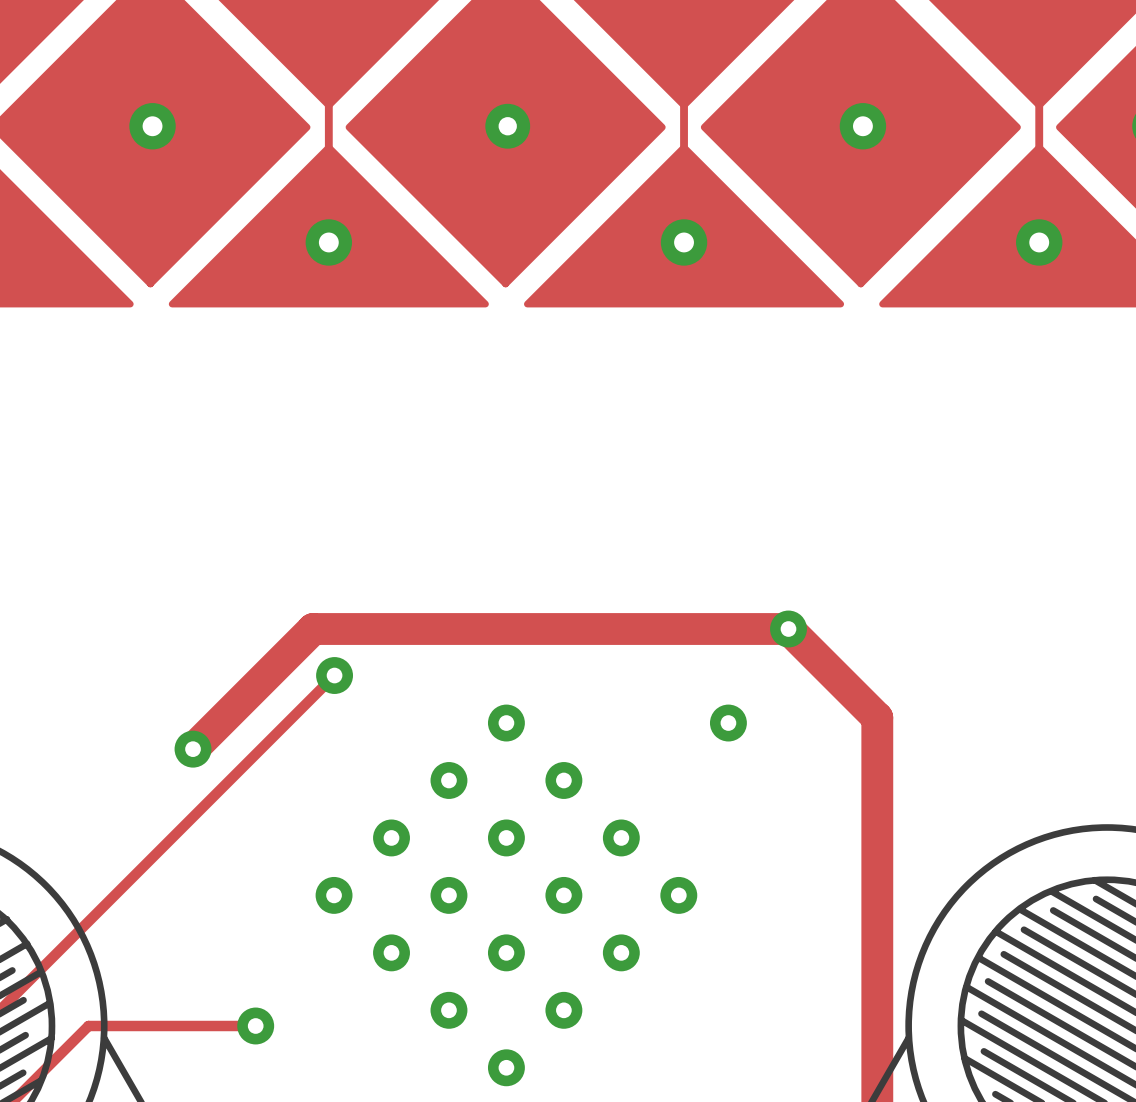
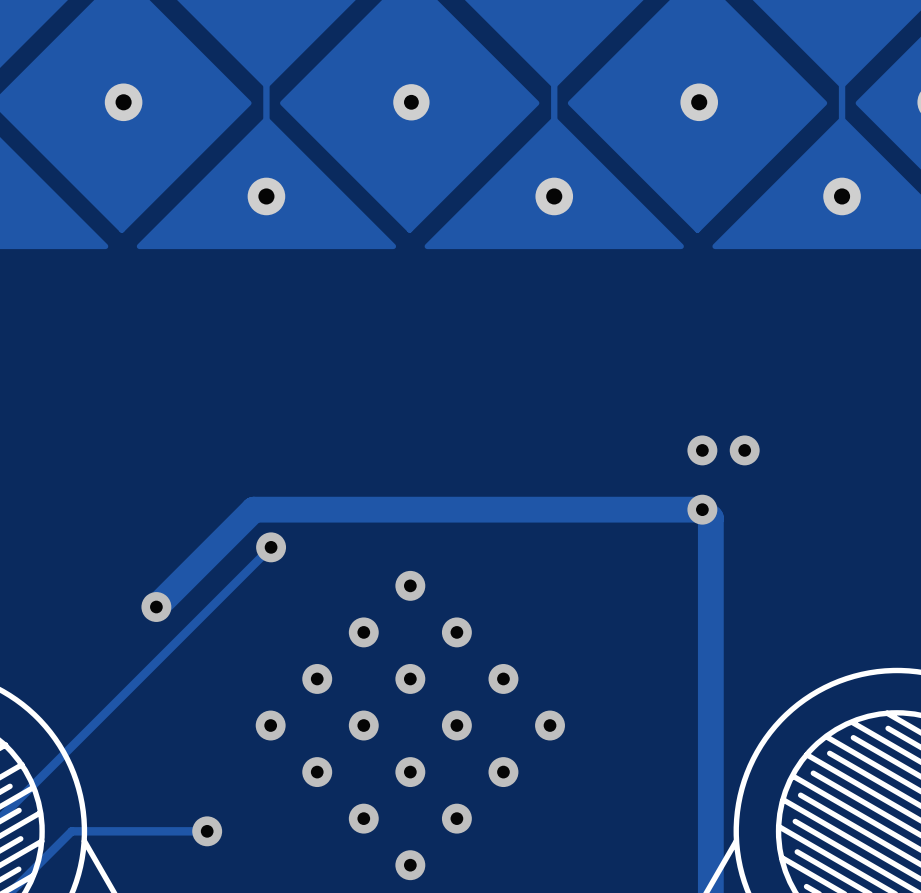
via: none -> (702, 450)
via: none -> (744, 450)
track: (788, 629) (877, 717) -> (638, 509) (702, 509) (710, 518) (710, 581)
via: (788, 629) -> none
via: none -> (702, 509)
via: (728, 723) -> none

